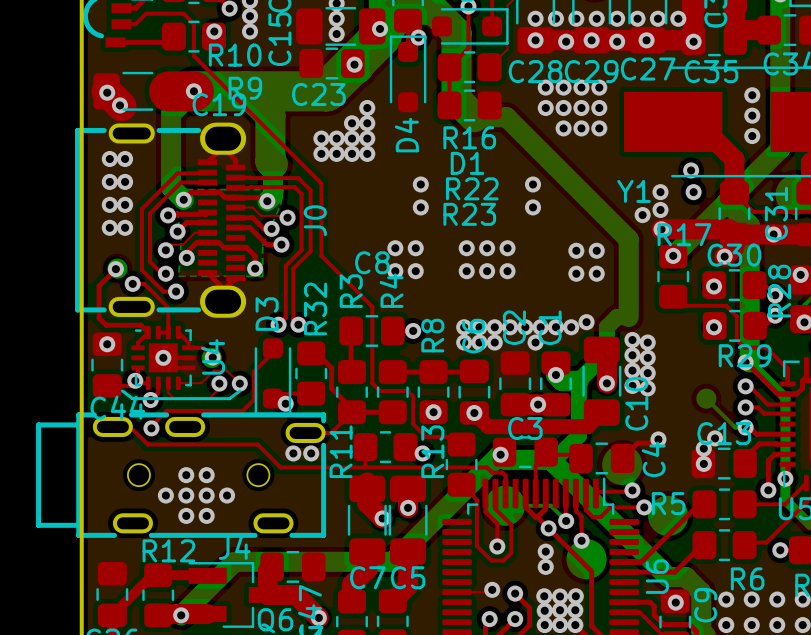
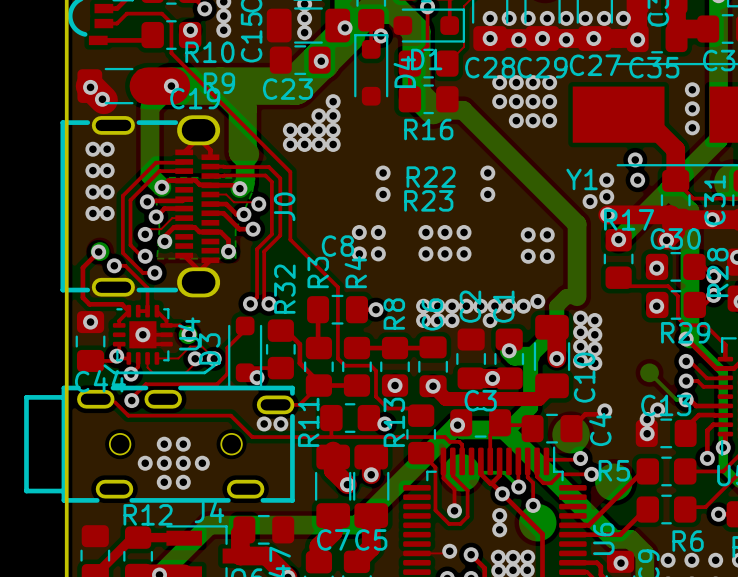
D4 name position: D4 (406, 135) -> D4 (404, 71)
D1 name position: D1 (467, 163) -> D1 (426, 59)
D3 name position: D3 (267, 314) -> D3 (209, 348)

